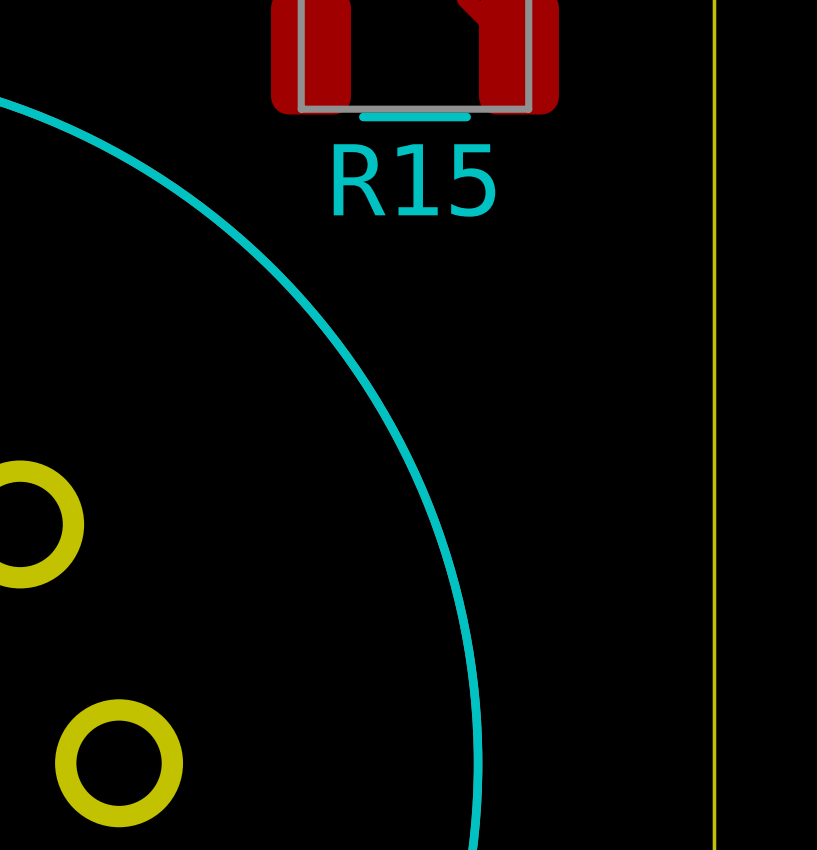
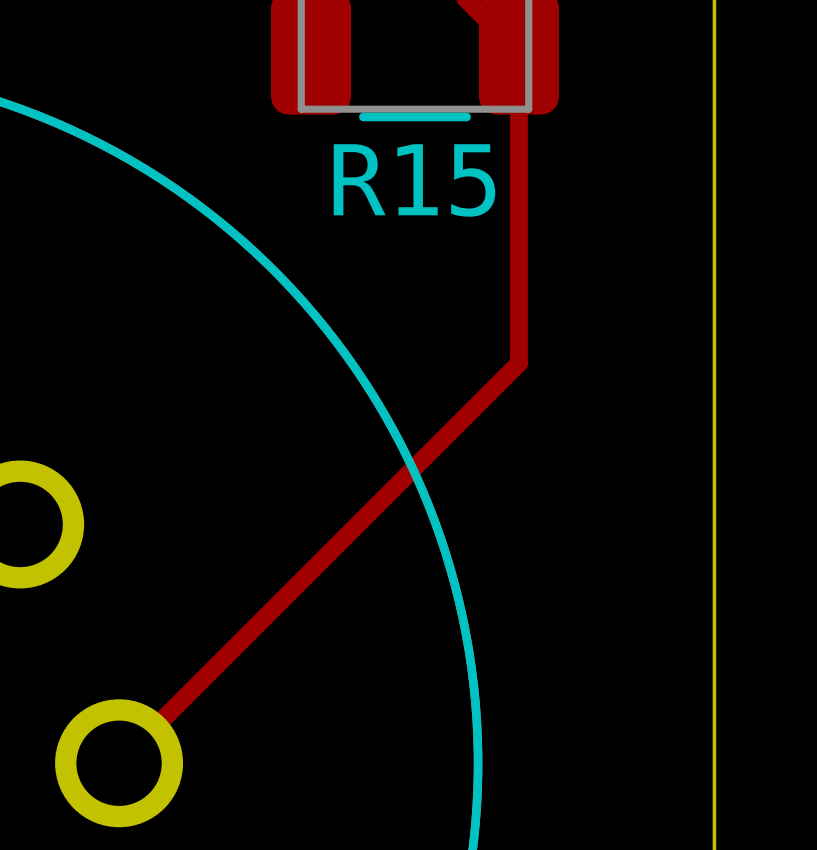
top track: none -> (518, 52) (518, 363) (119, 763)

